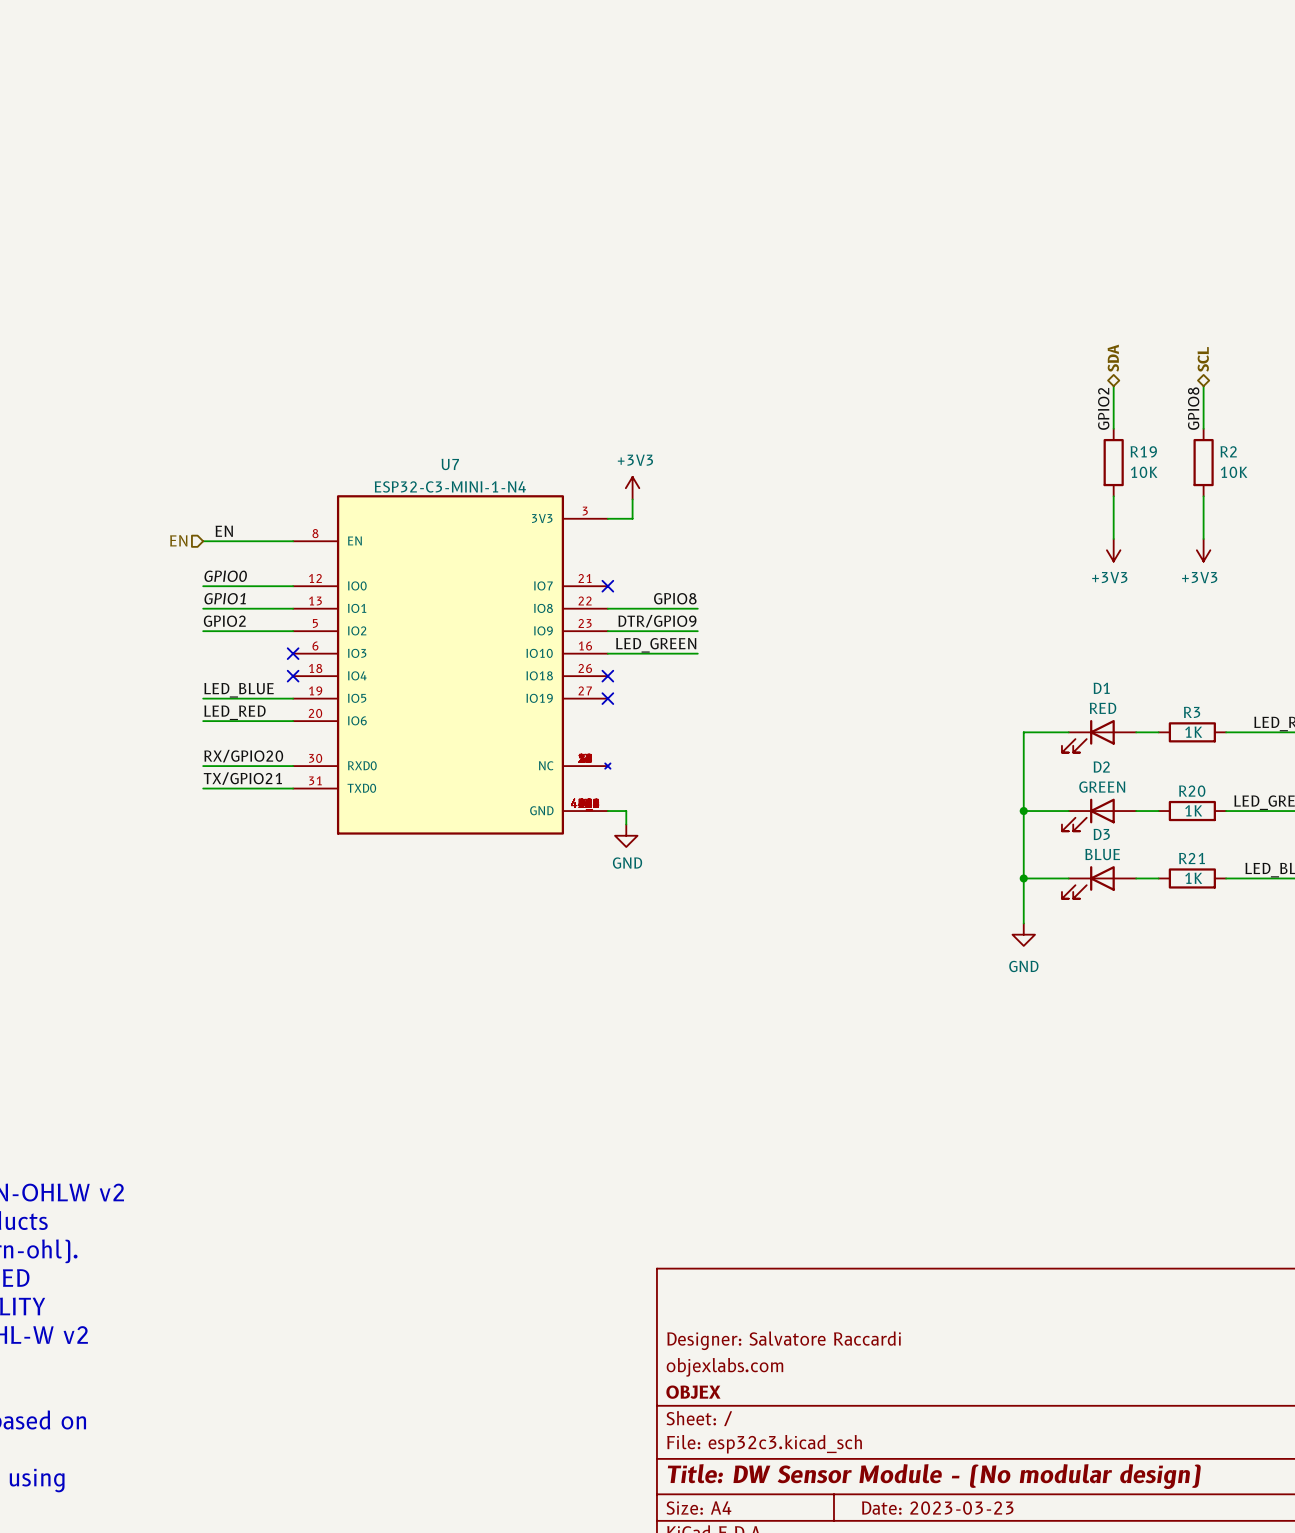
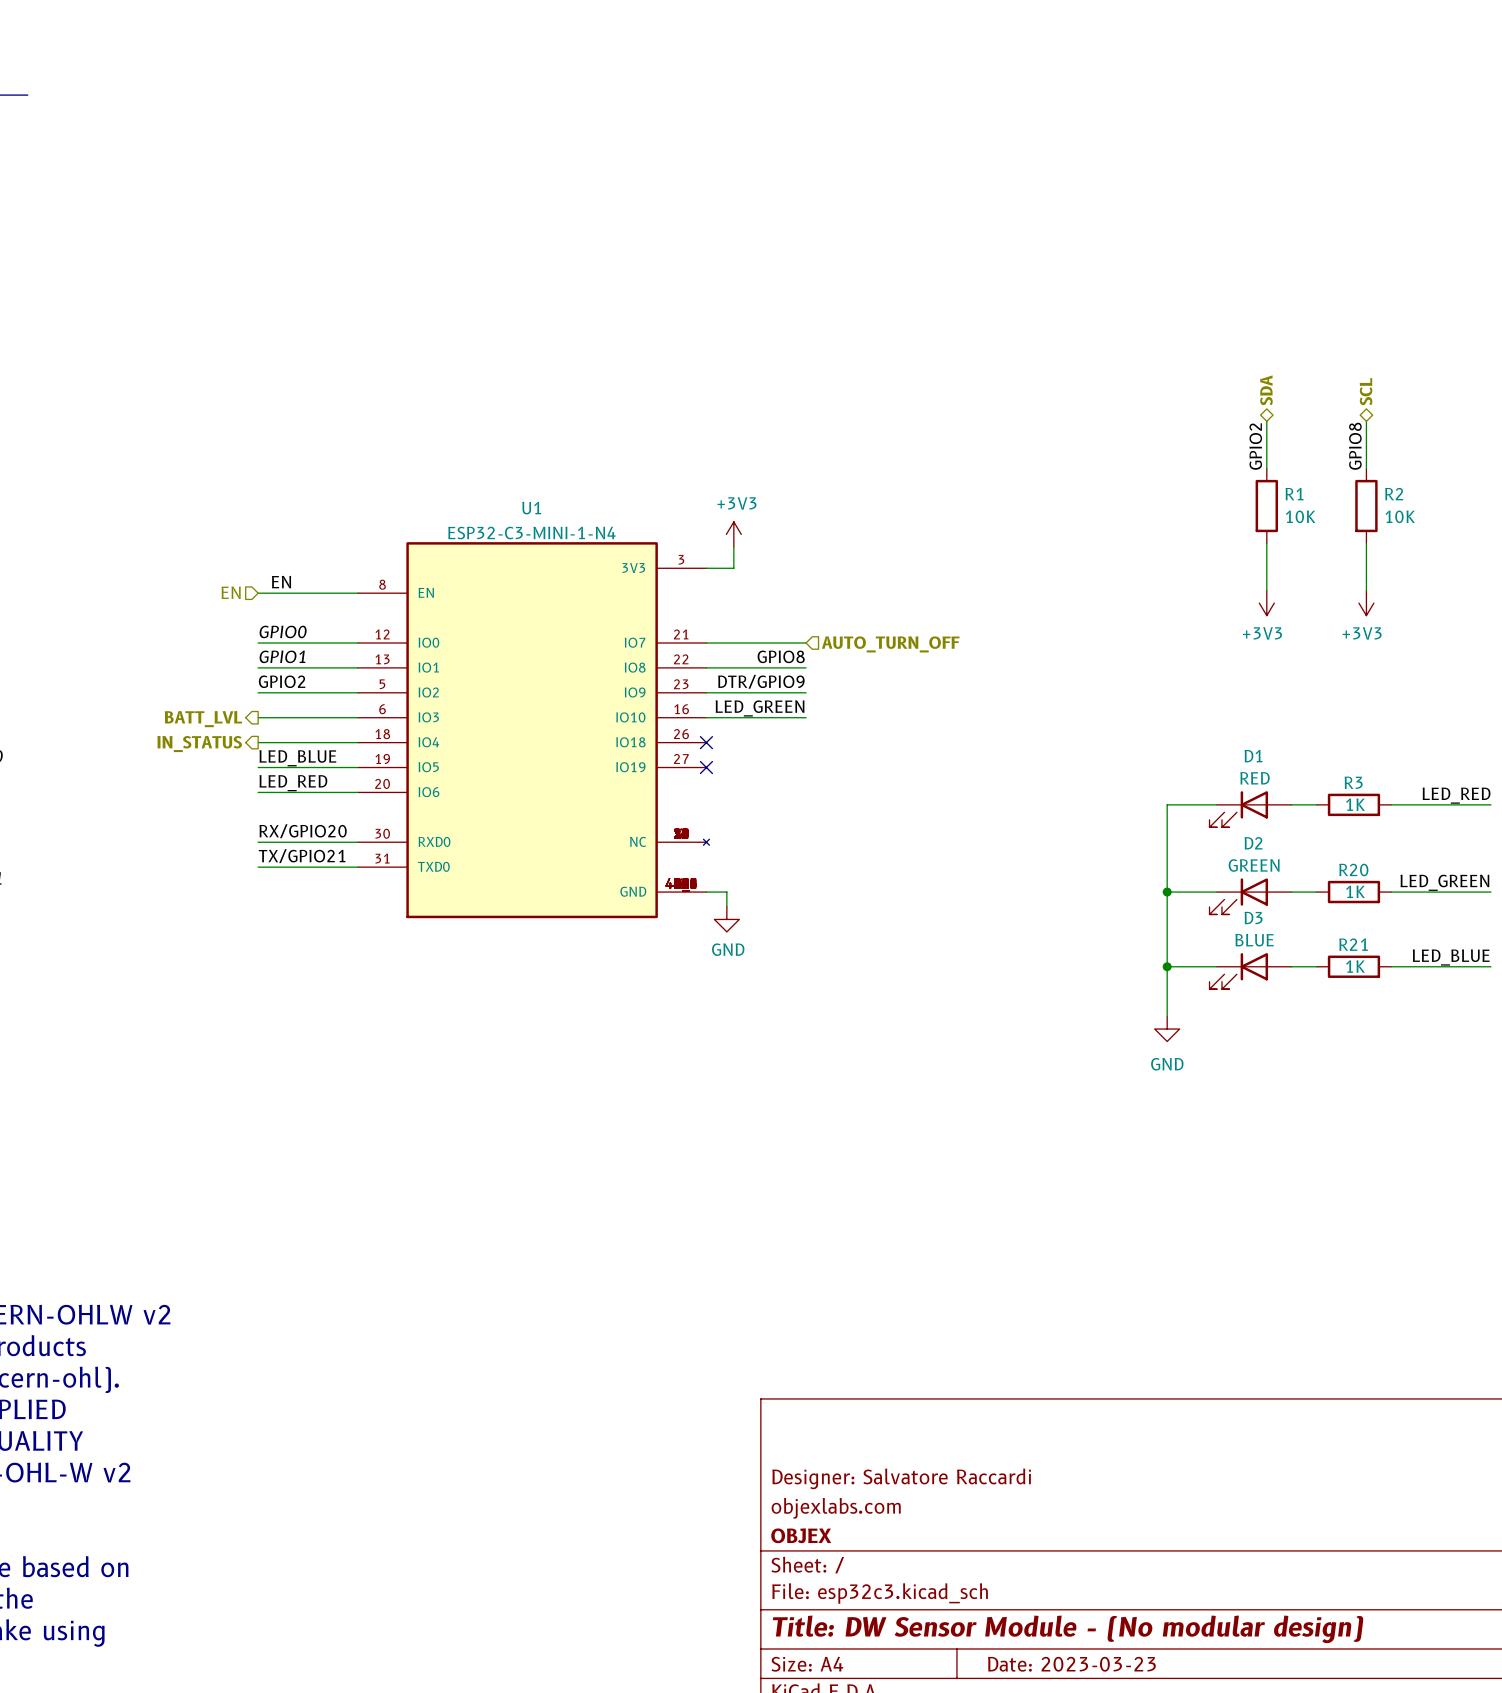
R19 name: R19 (1143, 451) -> R1 (1294, 494)
U7 name: U7 (450, 464) -> U1 (531, 508)
wire: none -> (706, 643) (806, 643)
no-connect mark: (607, 586) -> none
hierarchical label: none -> AUTO_TURN_OFF (890, 644)
wire: none -> (258, 717) (357, 717)
no-connect mark: (293, 653) -> none
hierarchical label: none -> BATT_LVL (203, 719)
wire: none -> (258, 742) (357, 742)
no-connect mark: (293, 676) -> none
hierarchical label: none -> IN_STATUS (199, 744)

